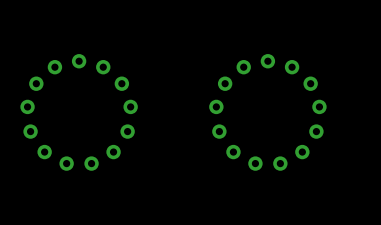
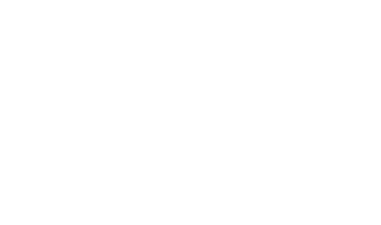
part: (79, 112) -> none
part: (267, 112) -> none

